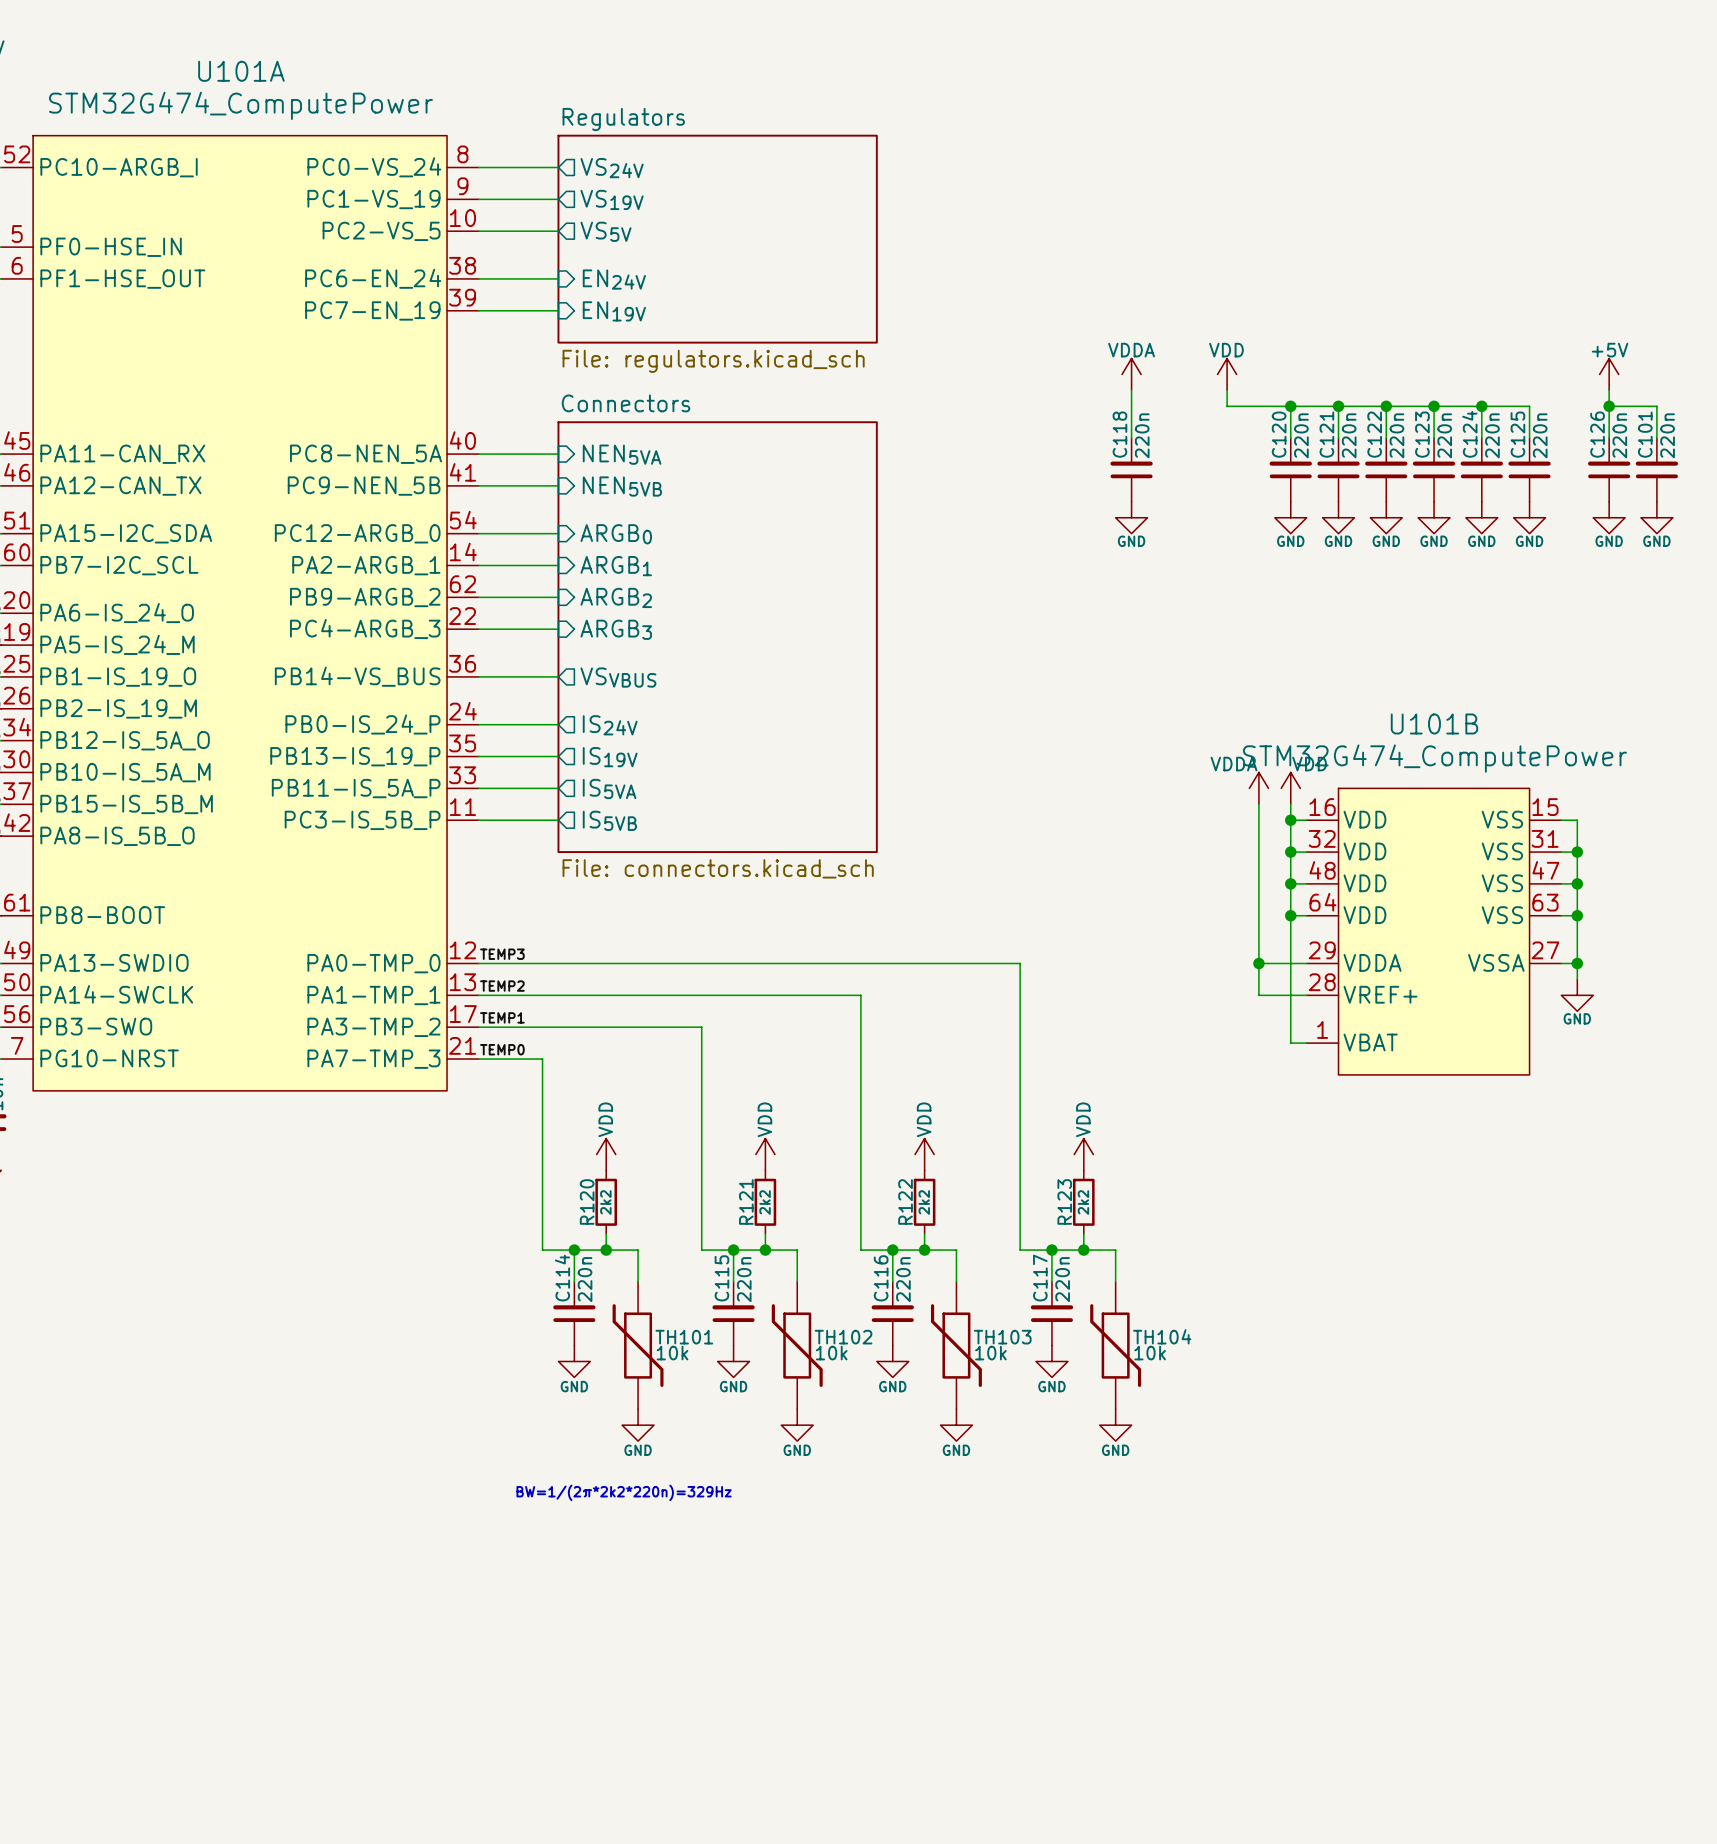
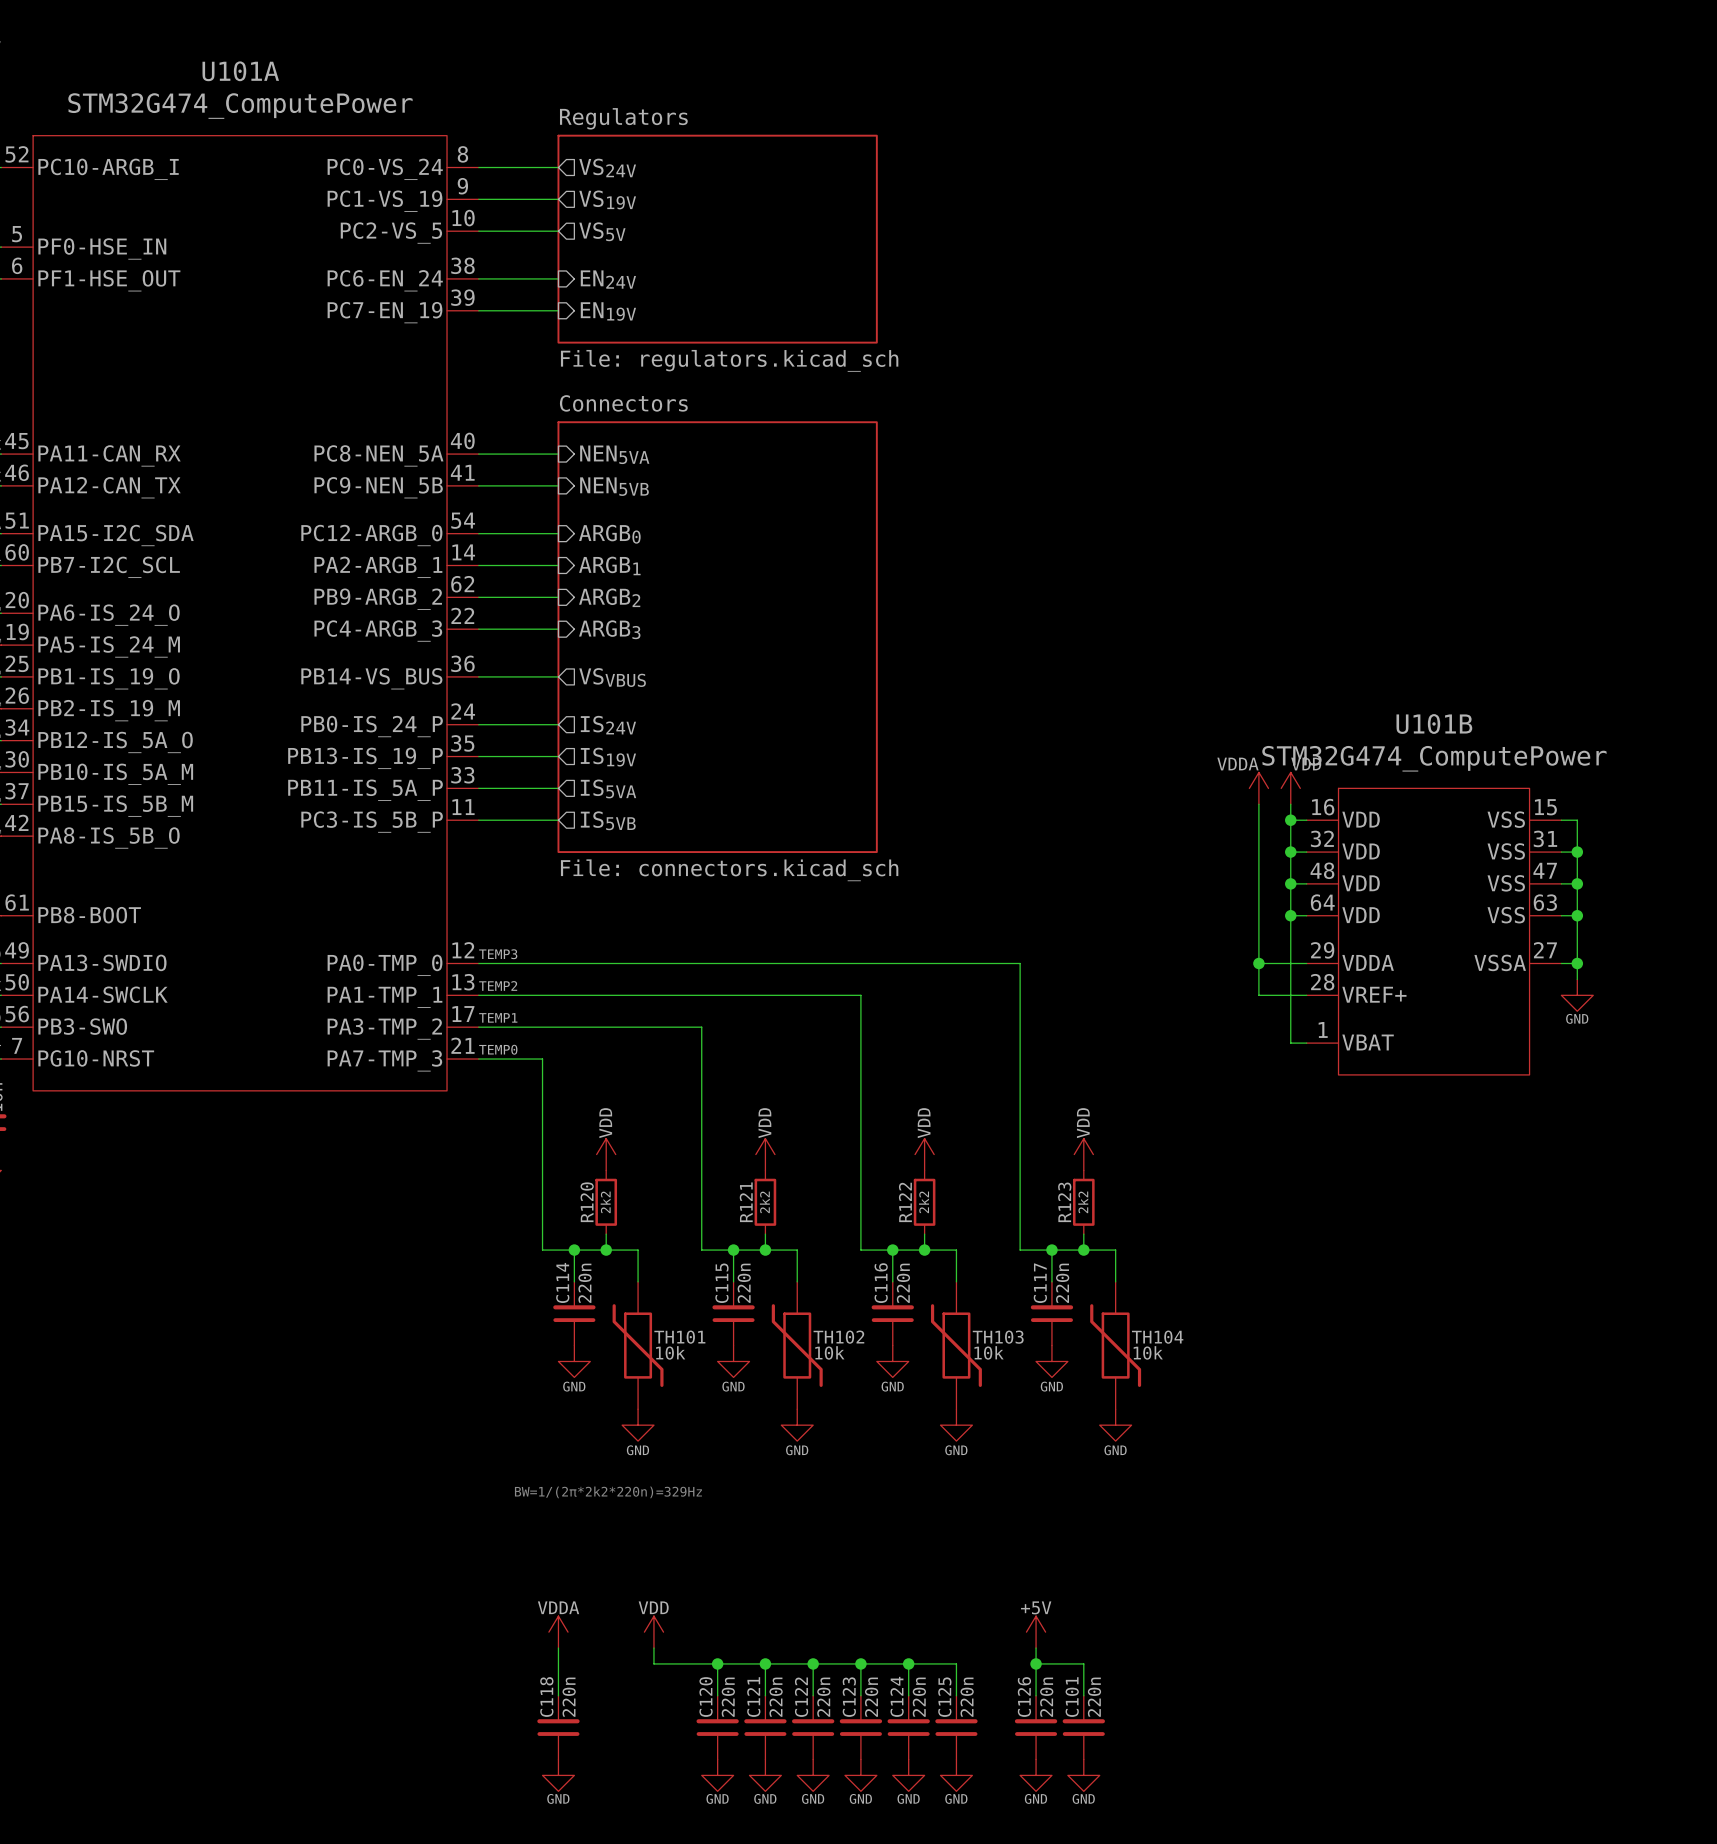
power symbol: VDDA (1131, 374) -> none
power symbol: VDD (1227, 374) -> none
power symbol: +5V (1609, 374) -> none
wire: (1131, 390) (1131, 438) -> none
wire: (1227, 390) (1227, 406) (1529, 406) (1529, 438) -> none
wire: (1609, 390) (1609, 438) -> none
wire: (1290, 406) (1290, 438) -> none
junction: (1290, 406) -> none
wire: (1338, 406) (1338, 438) -> none
junction: (1338, 406) -> none
wire: (1386, 406) (1386, 438) -> none
junction: (1386, 406) -> none
wire: (1434, 406) (1434, 438) -> none
junction: (1434, 406) -> none
wire: (1481, 406) (1481, 438) -> none
junction: (1481, 406) -> none
wire: (1609, 406) (1656, 406) (1656, 438) -> none
junction: (1609, 406) -> none
C118 position: (1131, 469) -> (558, 1727)
C120 position: (1290, 469) -> (717, 1727)
C121 position: (1338, 469) -> (765, 1727)
C122 position: (1386, 469) -> (813, 1727)
C123 position: (1434, 469) -> (860, 1727)
C124 position: (1481, 469) -> (908, 1727)
C125 position: (1529, 469) -> (956, 1727)
C126 position: (1609, 469) -> (1036, 1727)
C101 position: (1656, 469) -> (1083, 1727)
power symbol: GND (1131, 517) -> none
power symbol: GND (1290, 517) -> none
power symbol: GND (1338, 517) -> none
power symbol: GND (1386, 517) -> none
power symbol: GND (1434, 517) -> none
power symbol: GND (1481, 517) -> none
power symbol: GND (1529, 517) -> none
power symbol: GND (1609, 517) -> none
power symbol: GND (1656, 517) -> none
power symbol: none -> VDDA (558, 1632)
power symbol: none -> VDD (653, 1632)
power symbol: none -> +5V (1036, 1632)
wire: none -> (558, 1648) (558, 1695)
wire: none -> (653, 1648) (653, 1663) (956, 1663) (956, 1695)
wire: none -> (1036, 1648) (1036, 1695)
wire: none -> (717, 1663) (717, 1695)
junction: none -> (717, 1663)
wire: none -> (765, 1663) (765, 1695)
junction: none -> (765, 1663)
wire: none -> (813, 1663) (813, 1695)
junction: none -> (813, 1663)
wire: none -> (860, 1663) (860, 1695)
junction: none -> (860, 1663)
wire: none -> (908, 1663) (908, 1695)
junction: none -> (908, 1663)
wire: none -> (1036, 1663) (1083, 1663) (1083, 1695)
junction: none -> (1036, 1663)
power symbol: none -> GND (558, 1775)
power symbol: none -> GND (717, 1775)
power symbol: none -> GND (765, 1775)
power symbol: none -> GND (813, 1775)
power symbol: none -> GND (860, 1775)
power symbol: none -> GND (908, 1775)
power symbol: none -> GND (956, 1775)
power symbol: none -> GND (1036, 1775)
power symbol: none -> GND (1083, 1775)

